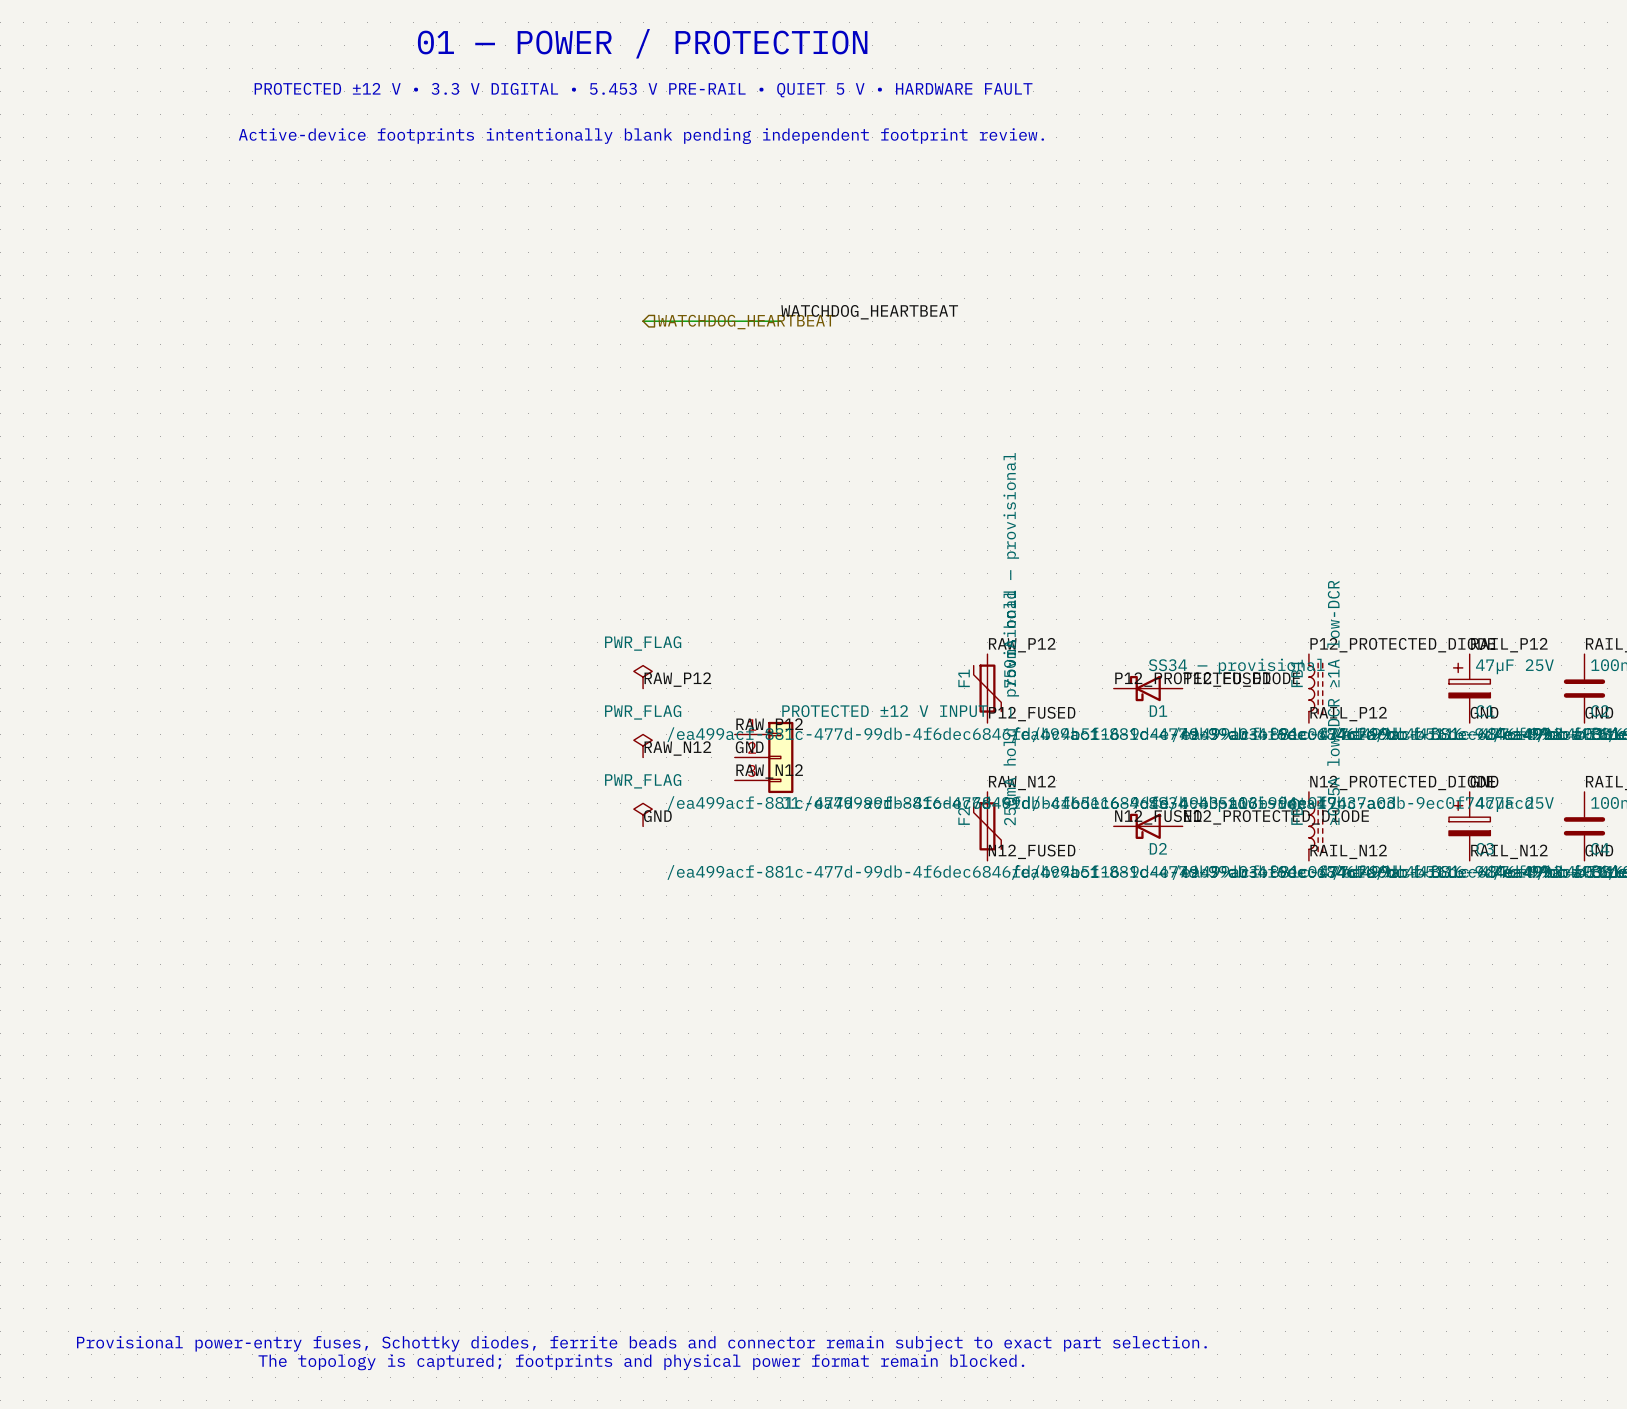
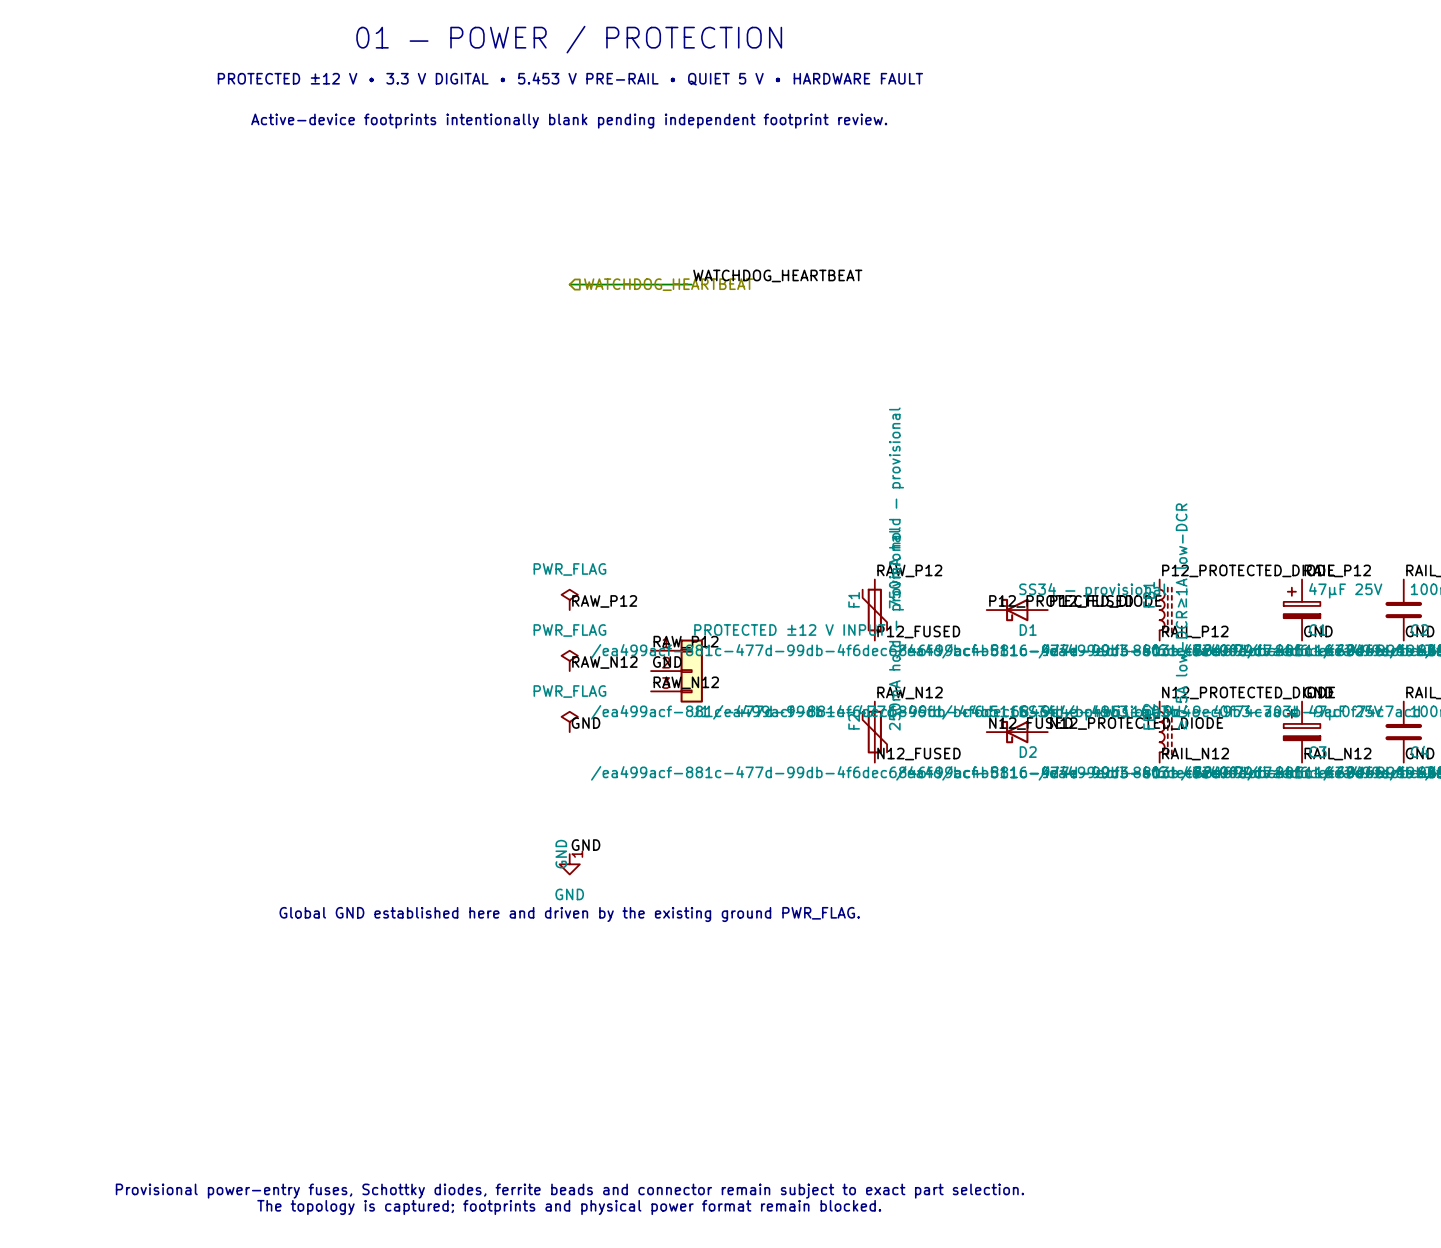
label: none -> GND (585, 845)
power symbol: none -> GND (569, 864)
text: none -> Global GND established here and driven by the existing ground PWR_FLAG. (569, 914)

